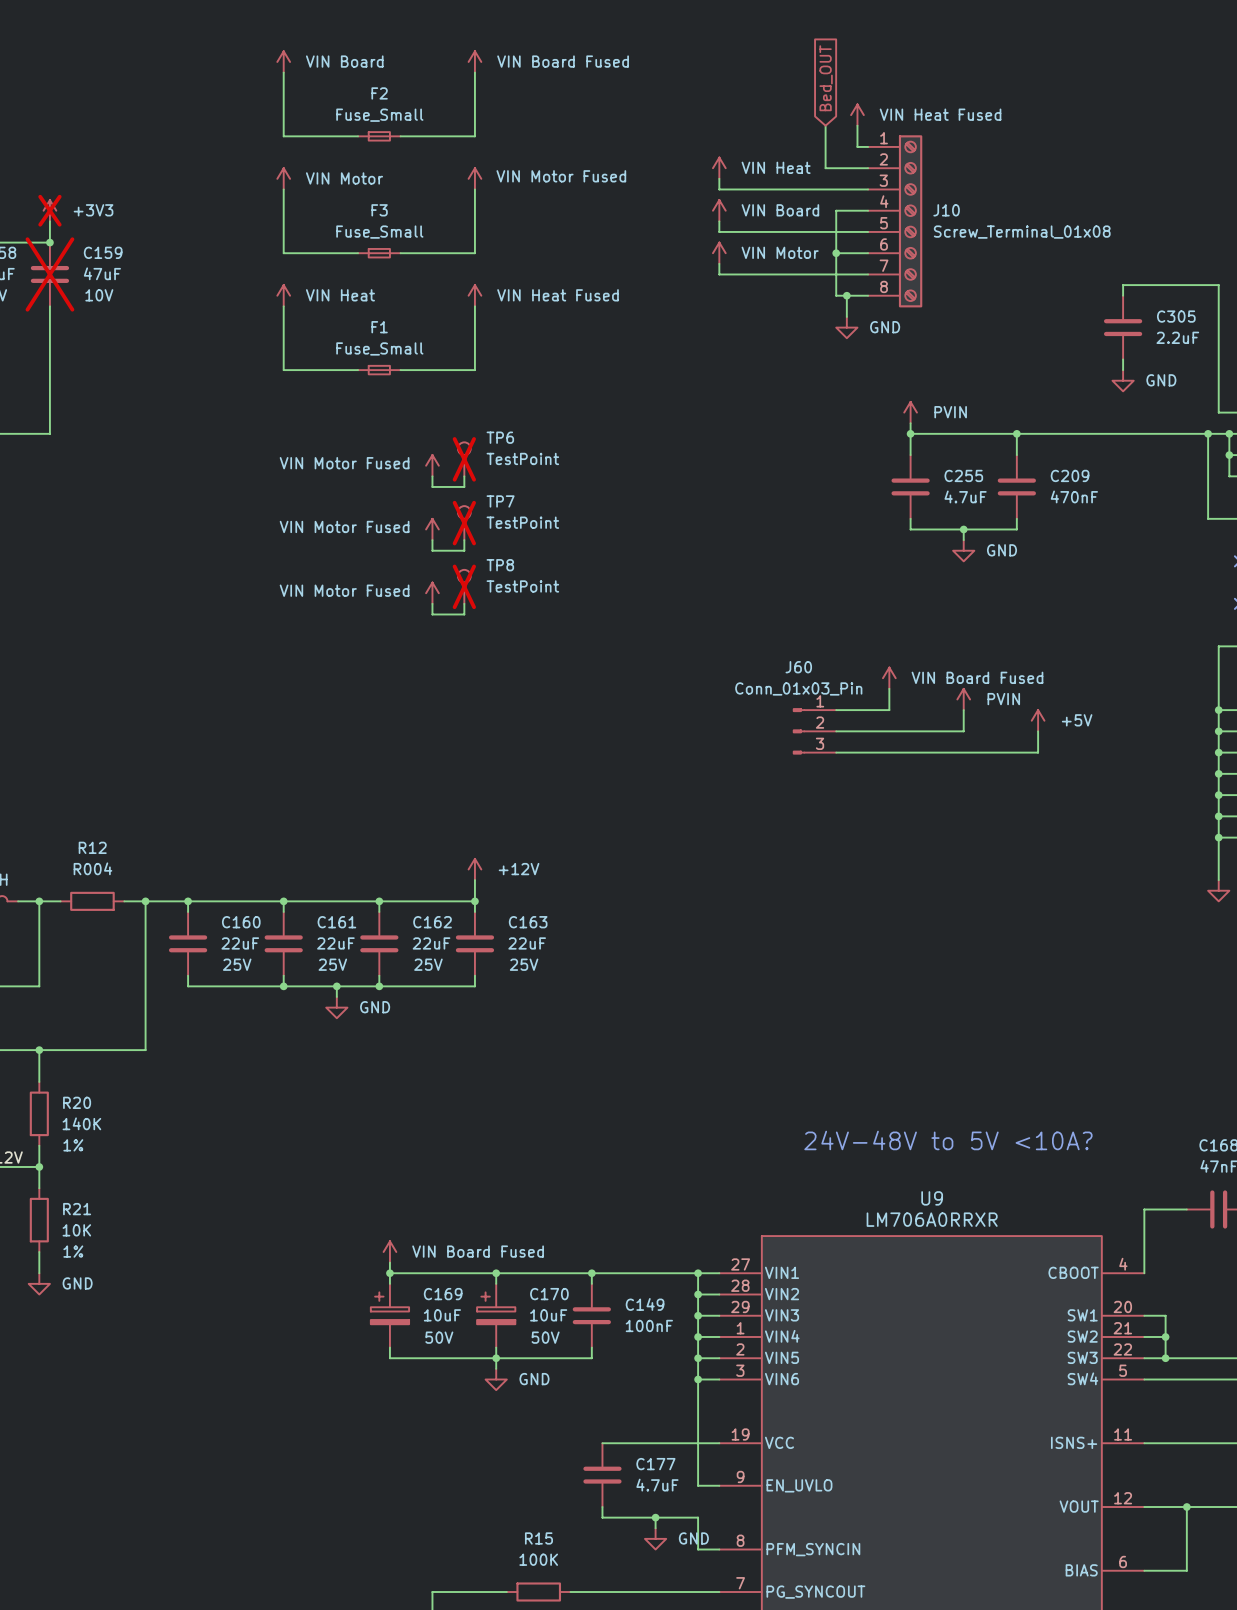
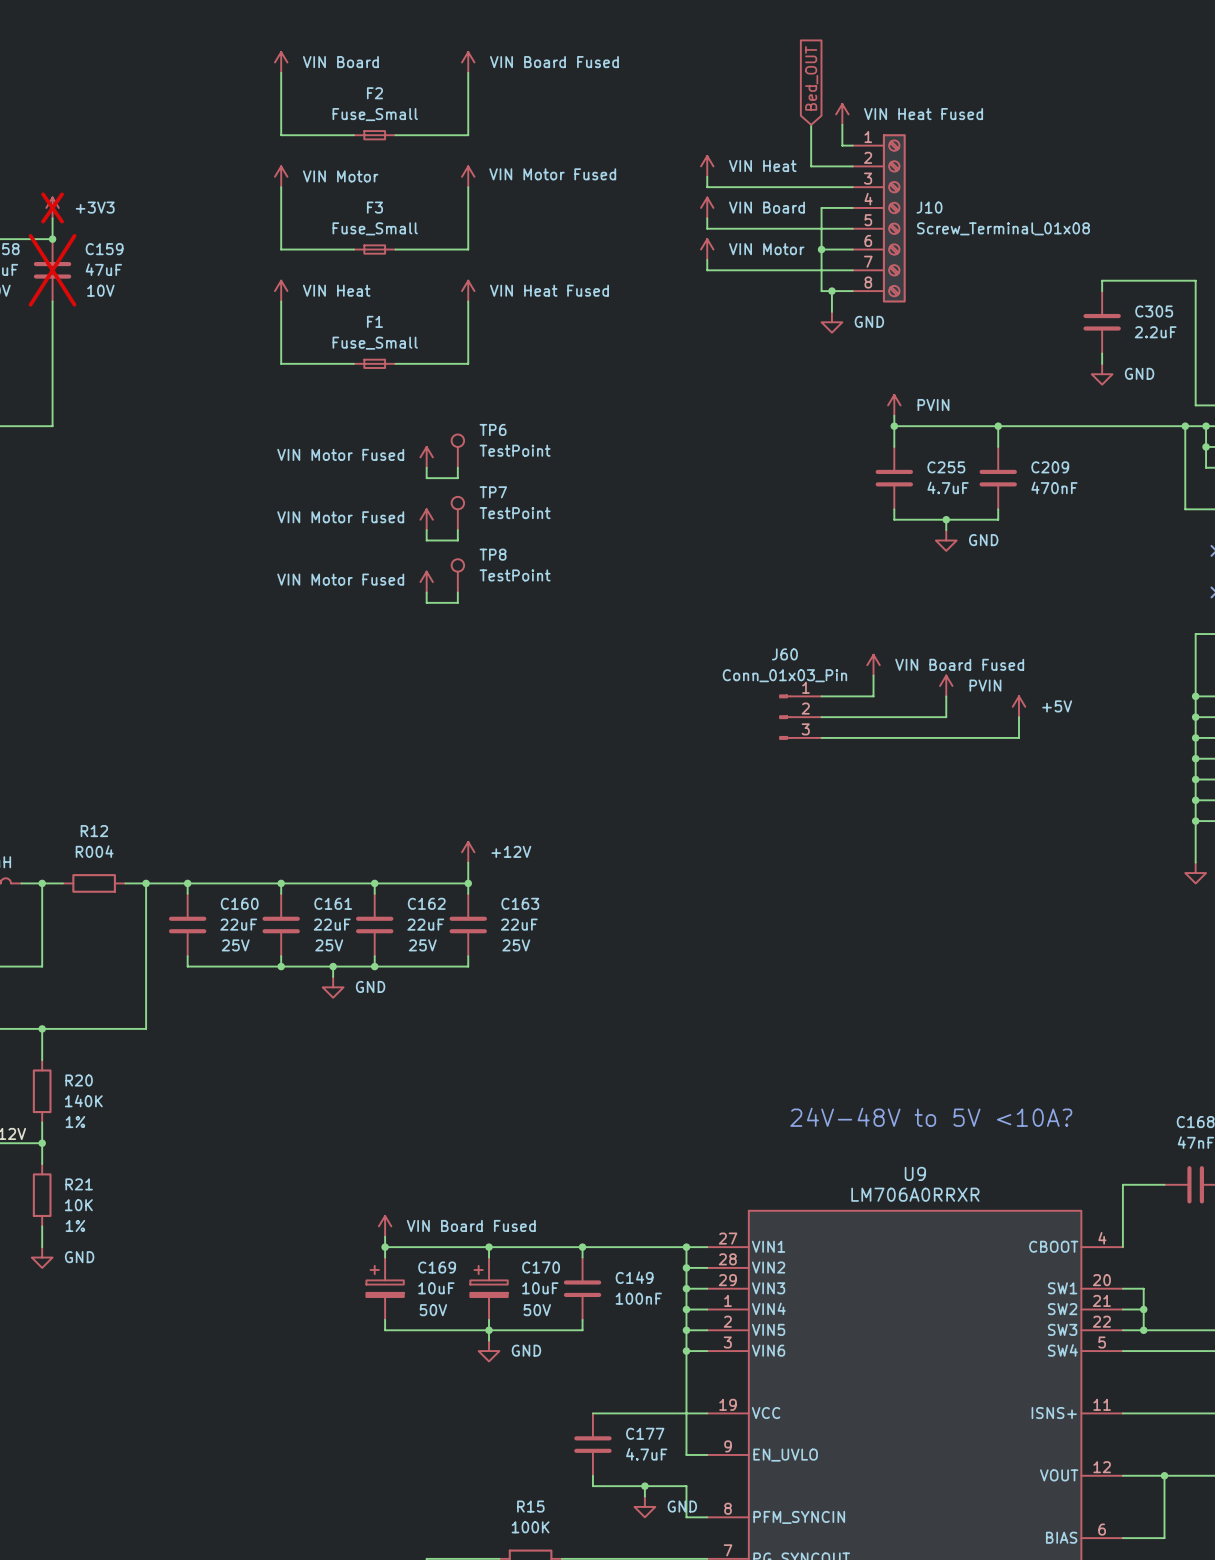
TP6 do-not-place cross: (464, 459) -> none
TP7 do-not-place cross: (464, 523) -> none
TP8 do-not-place cross: (464, 586) -> none

